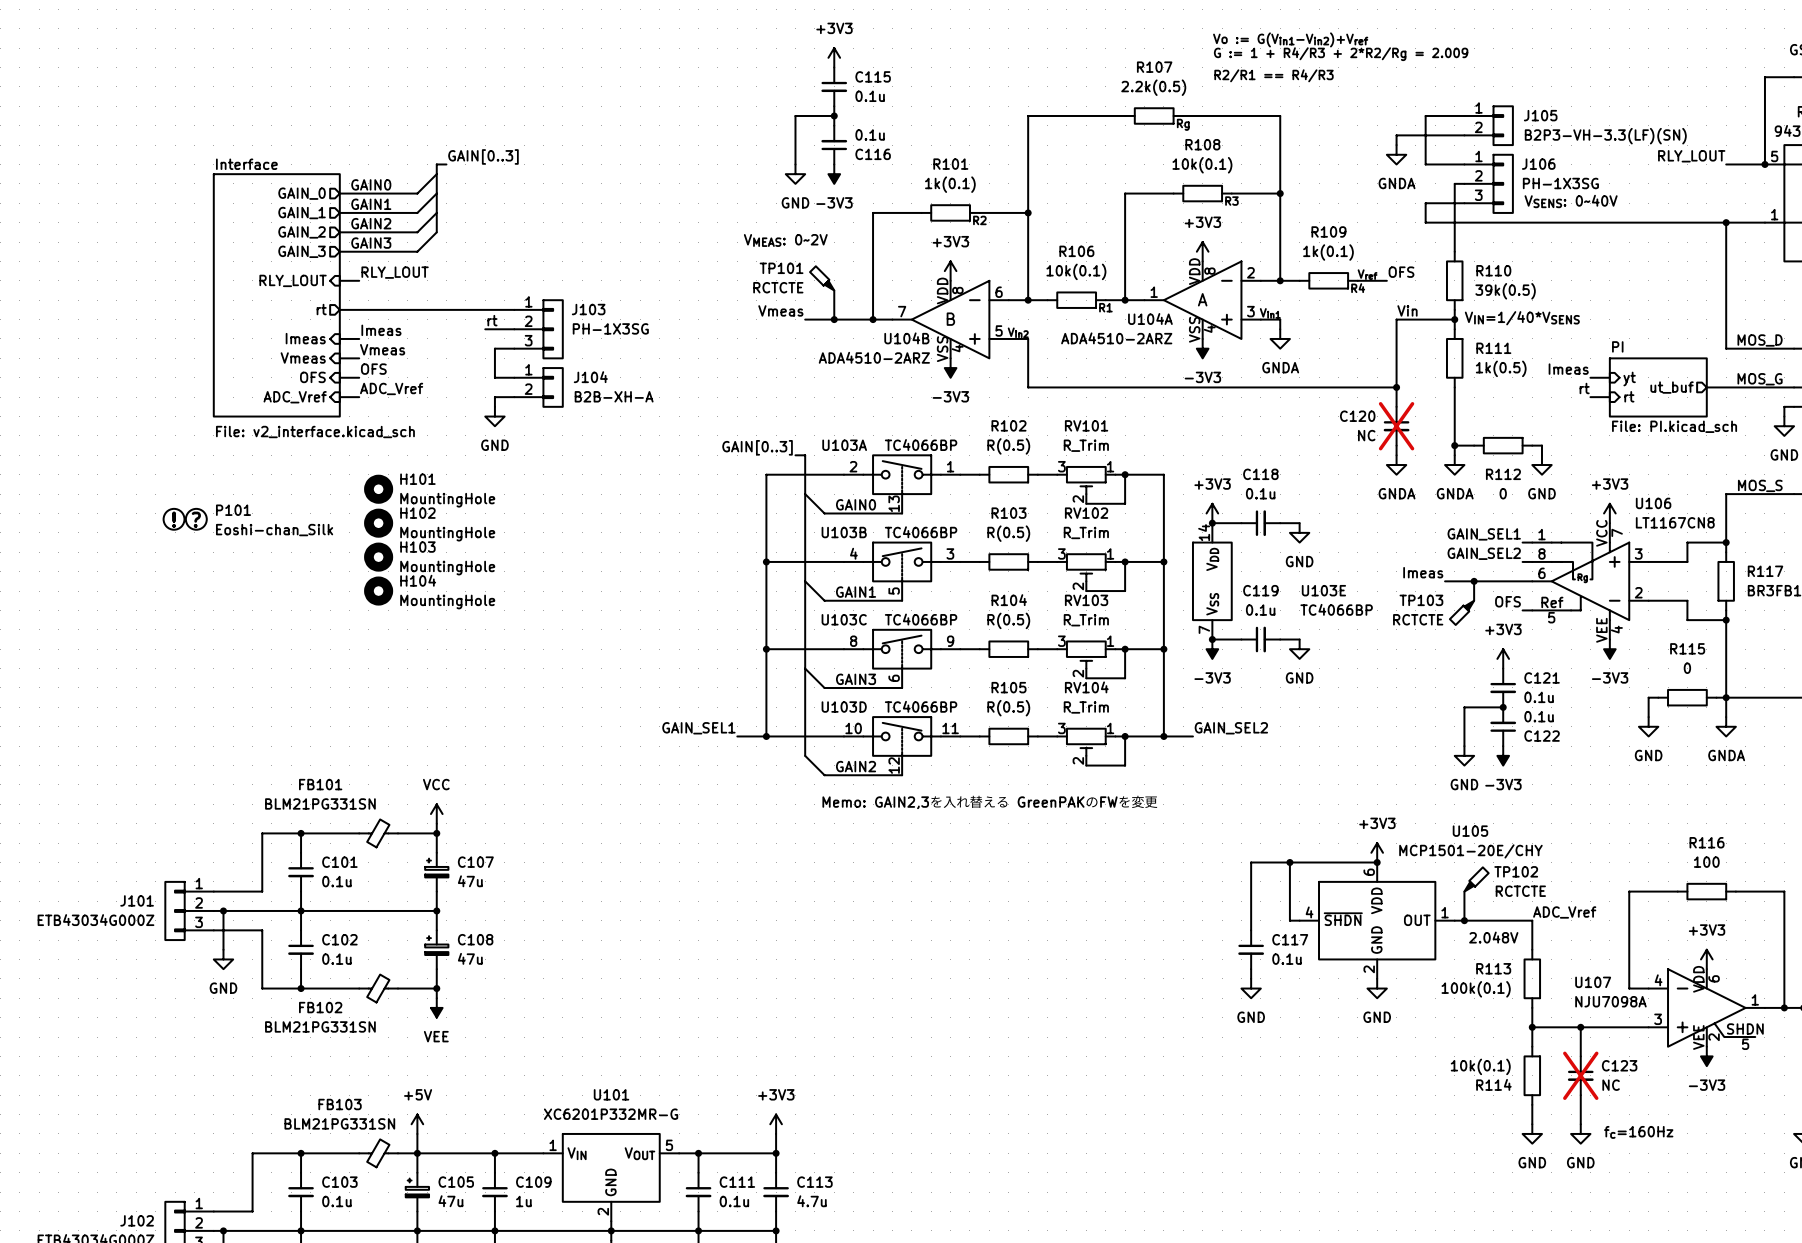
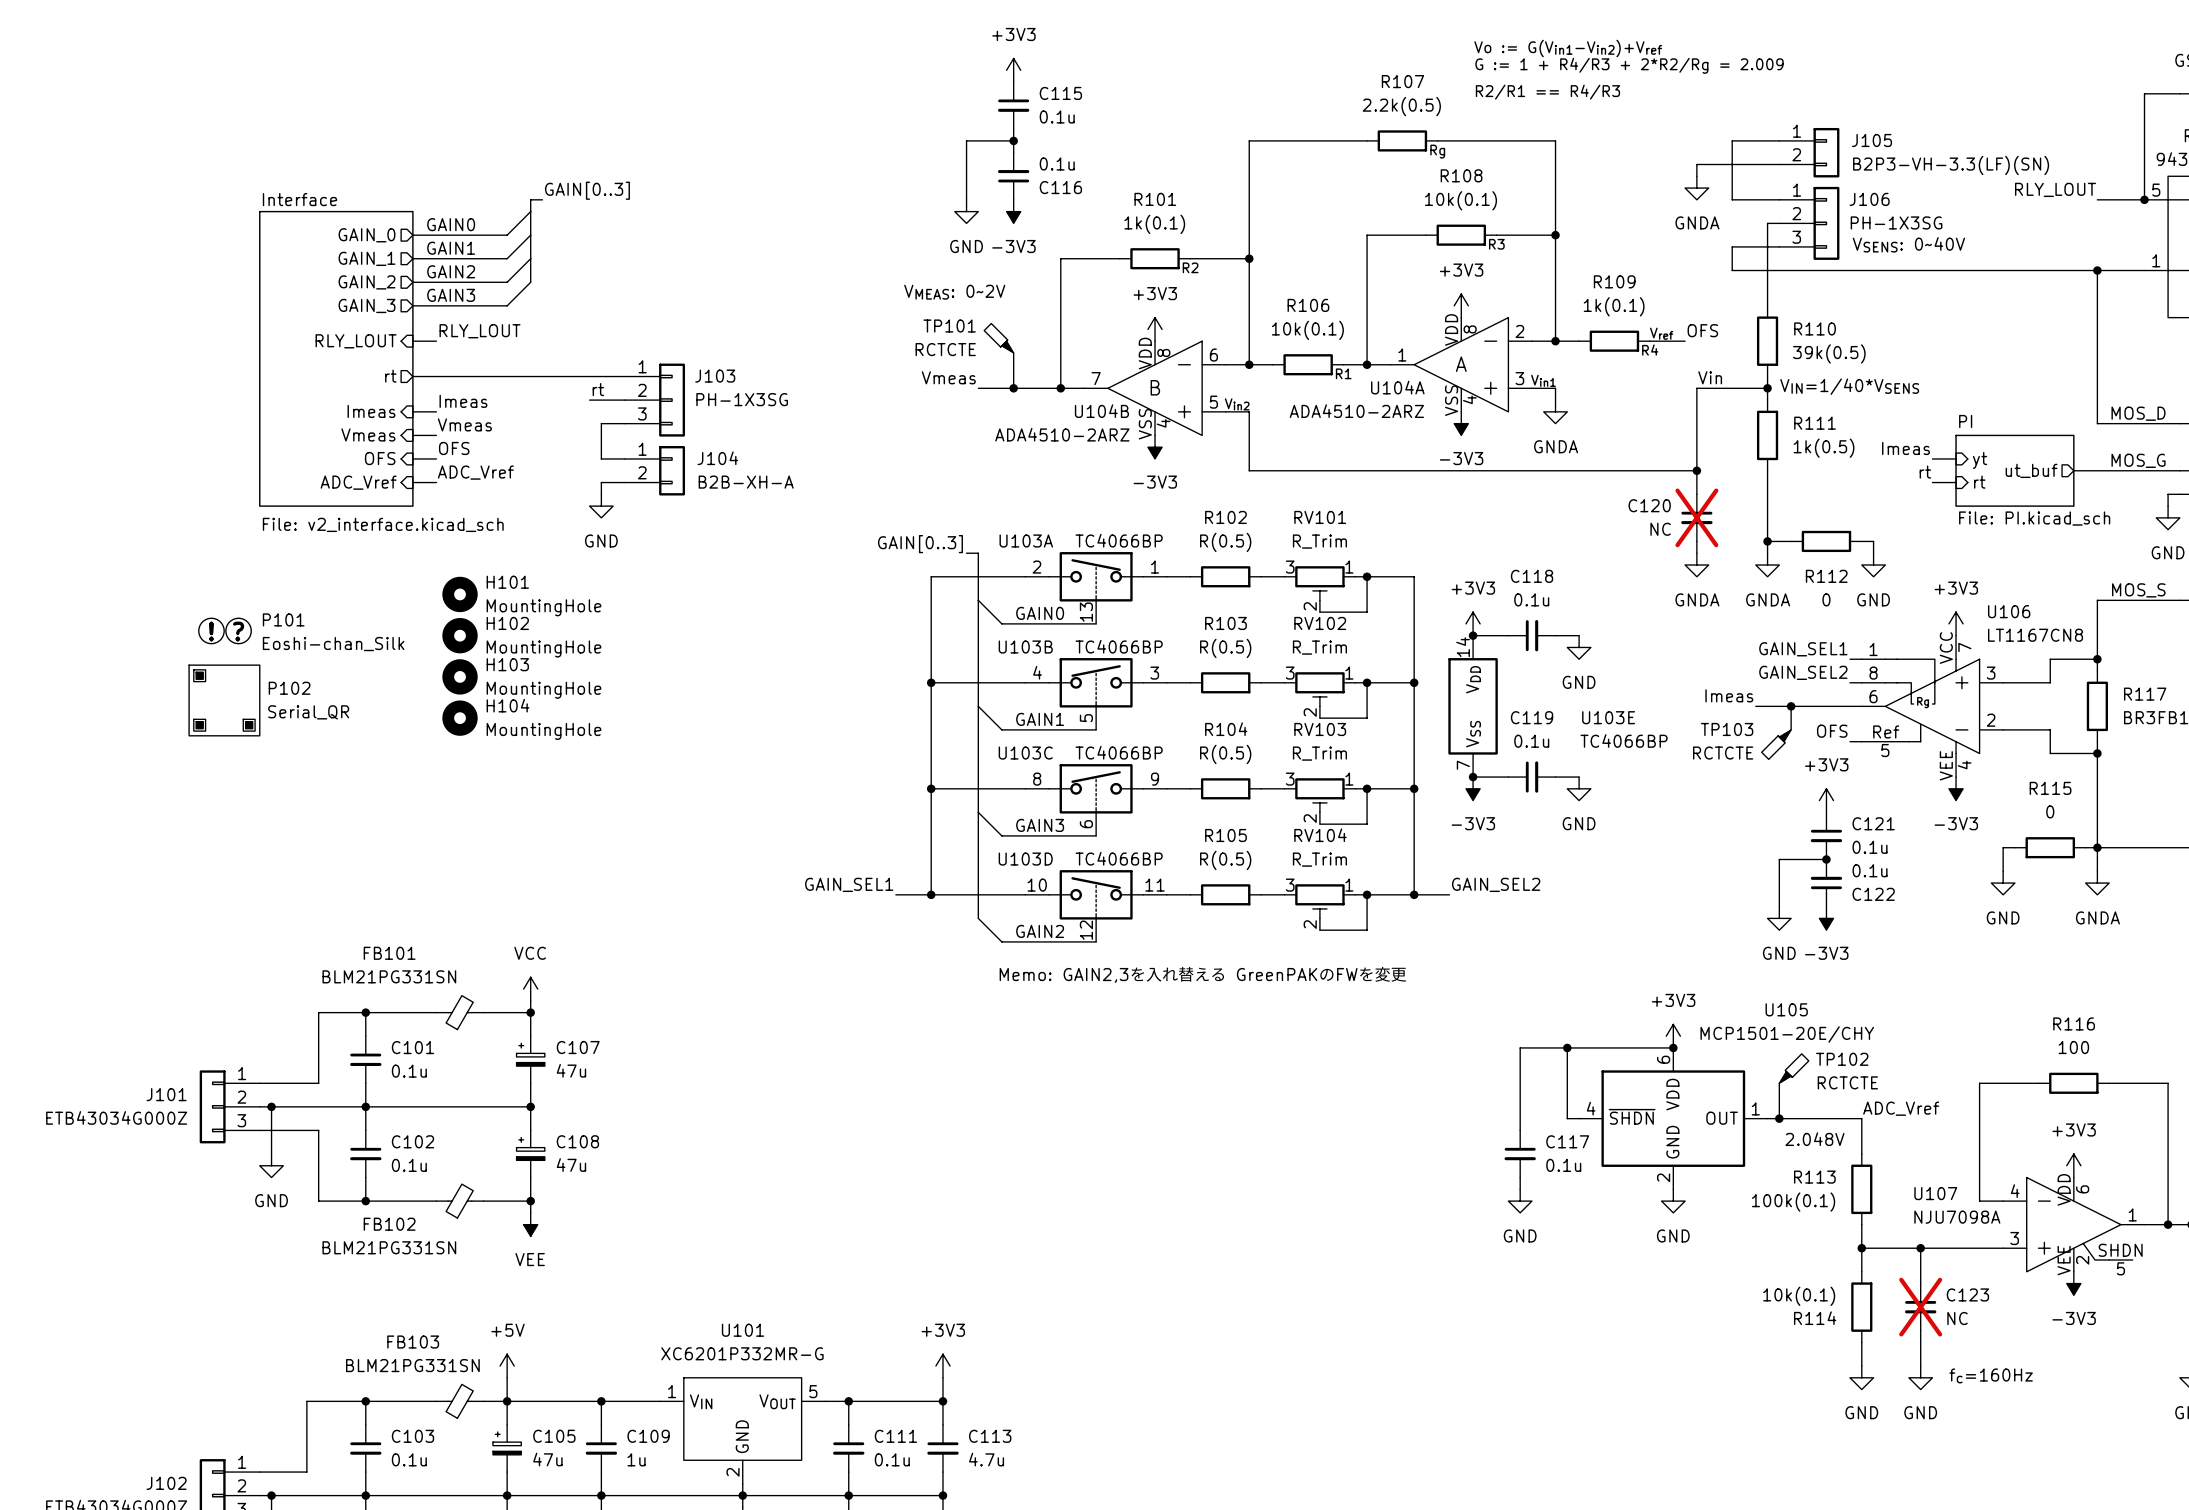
P102: none -> Serial_QR (224, 700)

